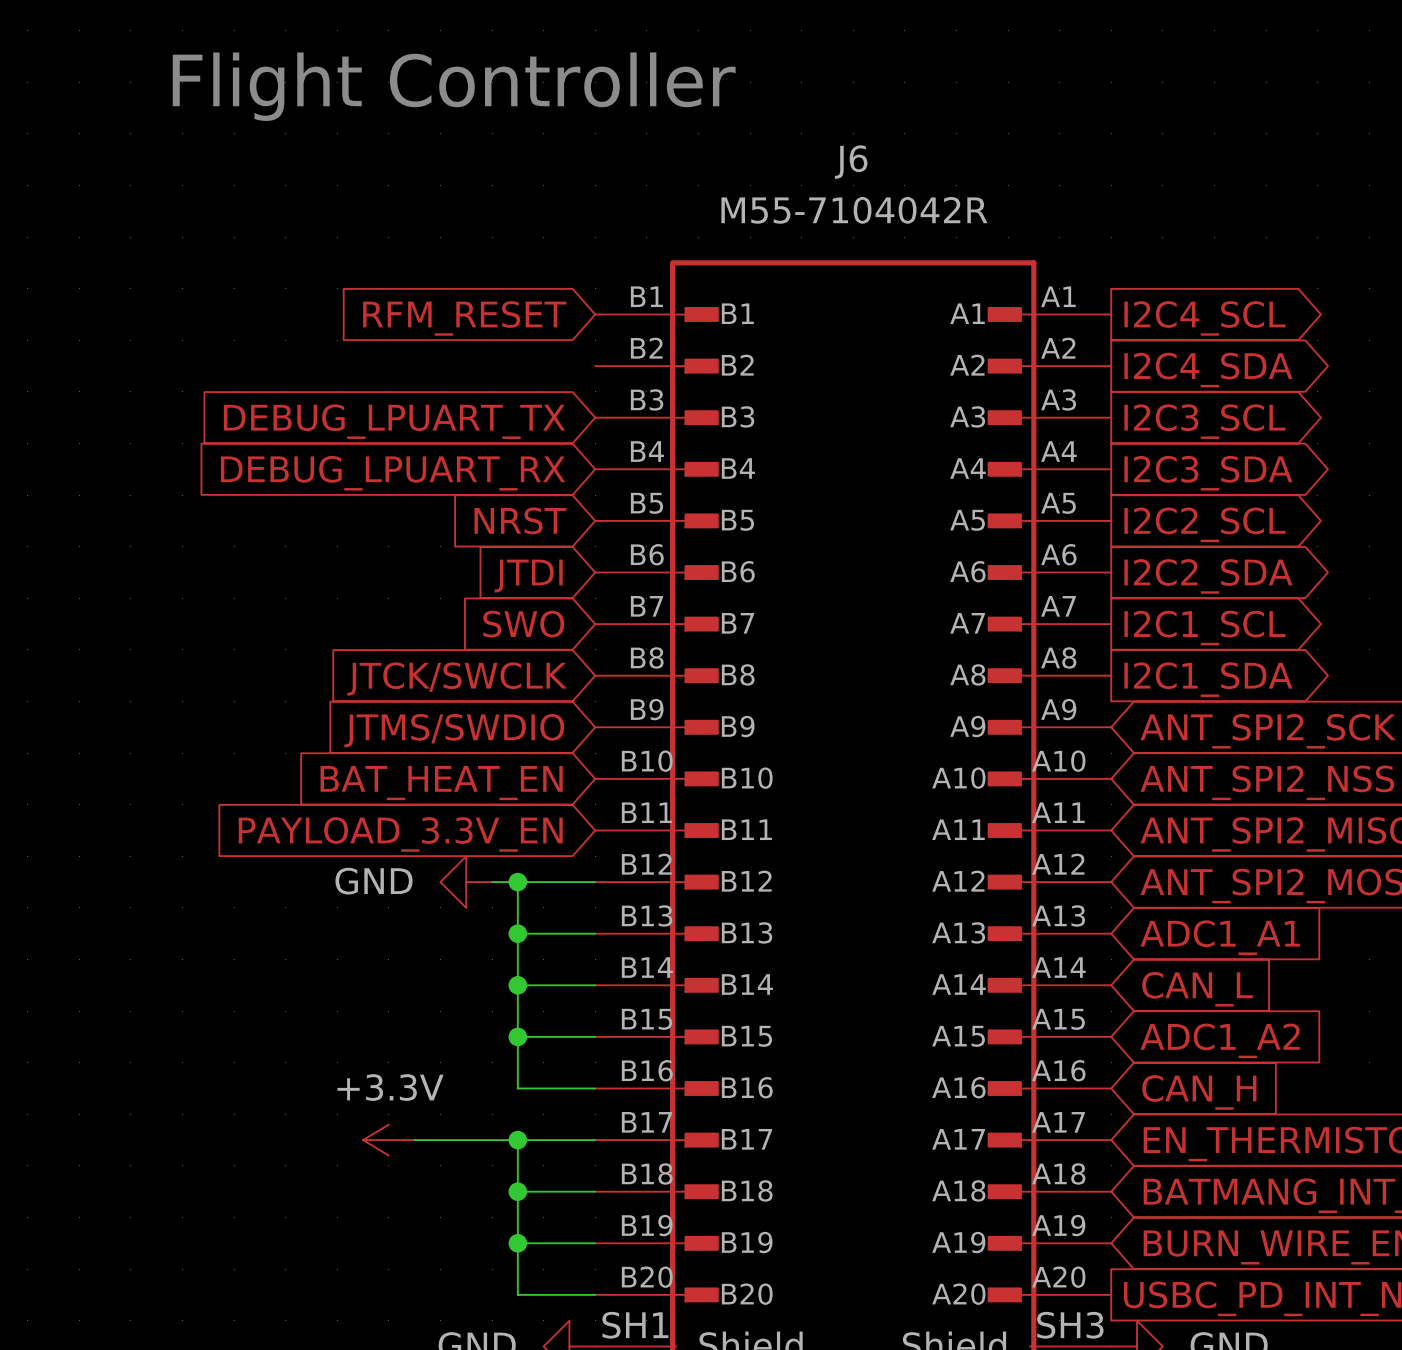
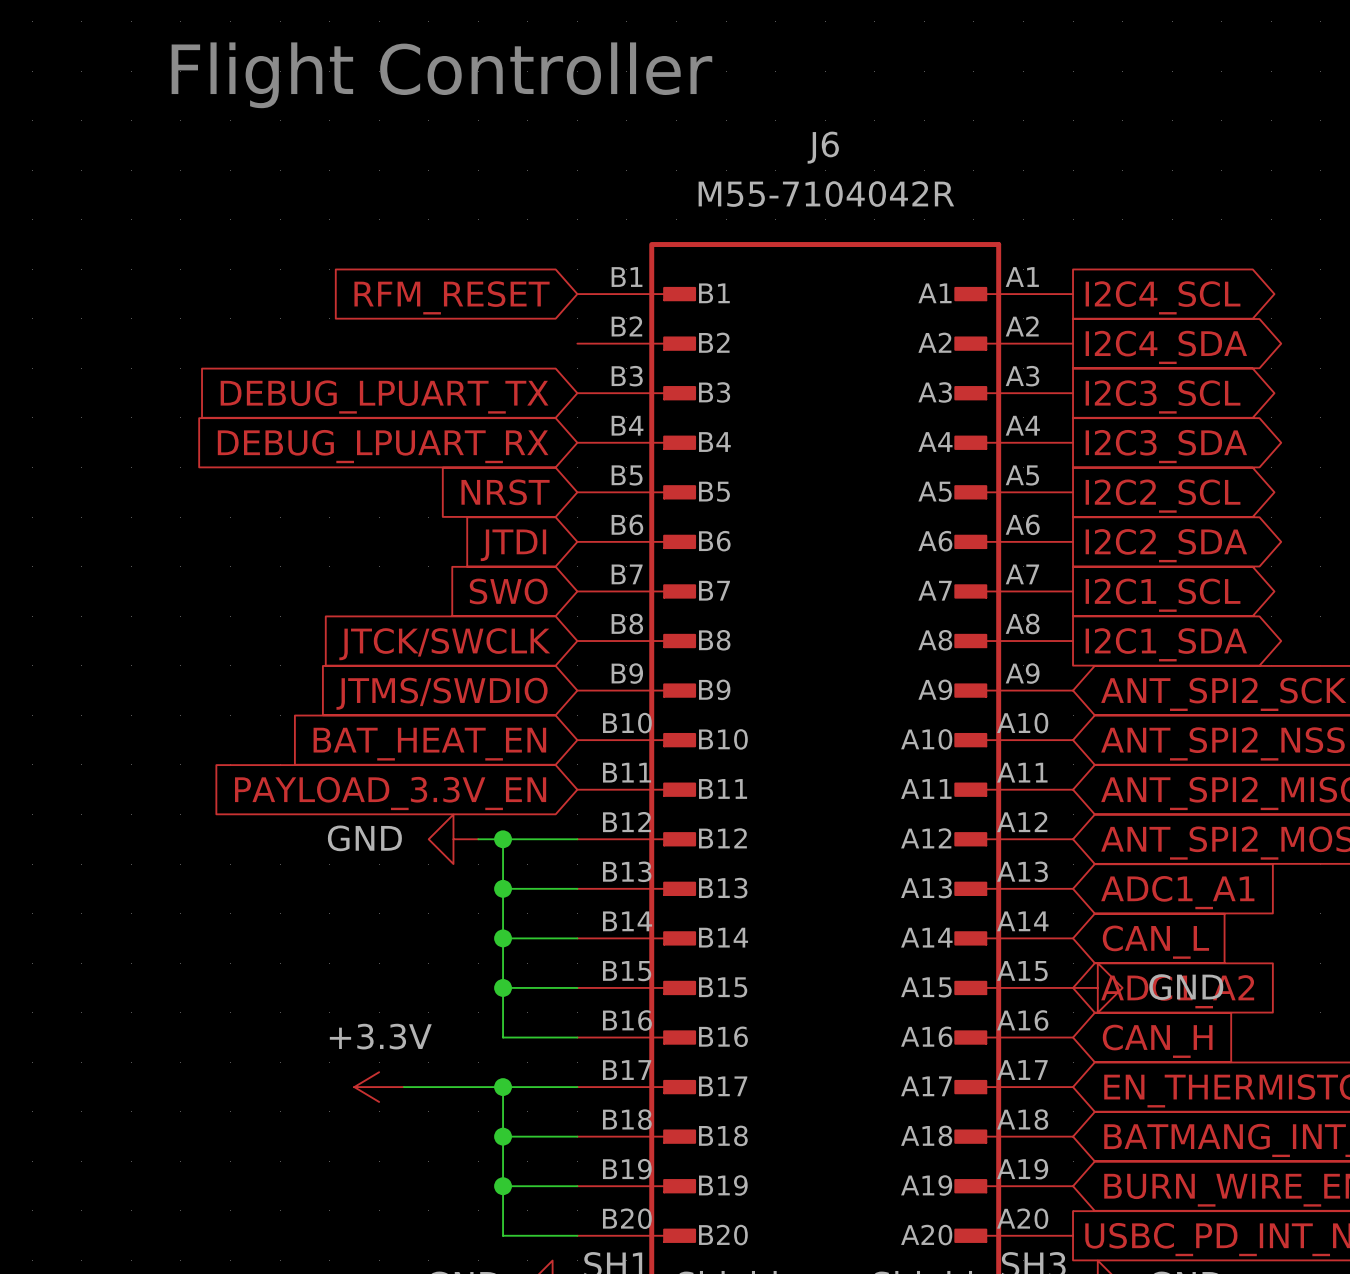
power symbol: none -> GND (1097, 987)

